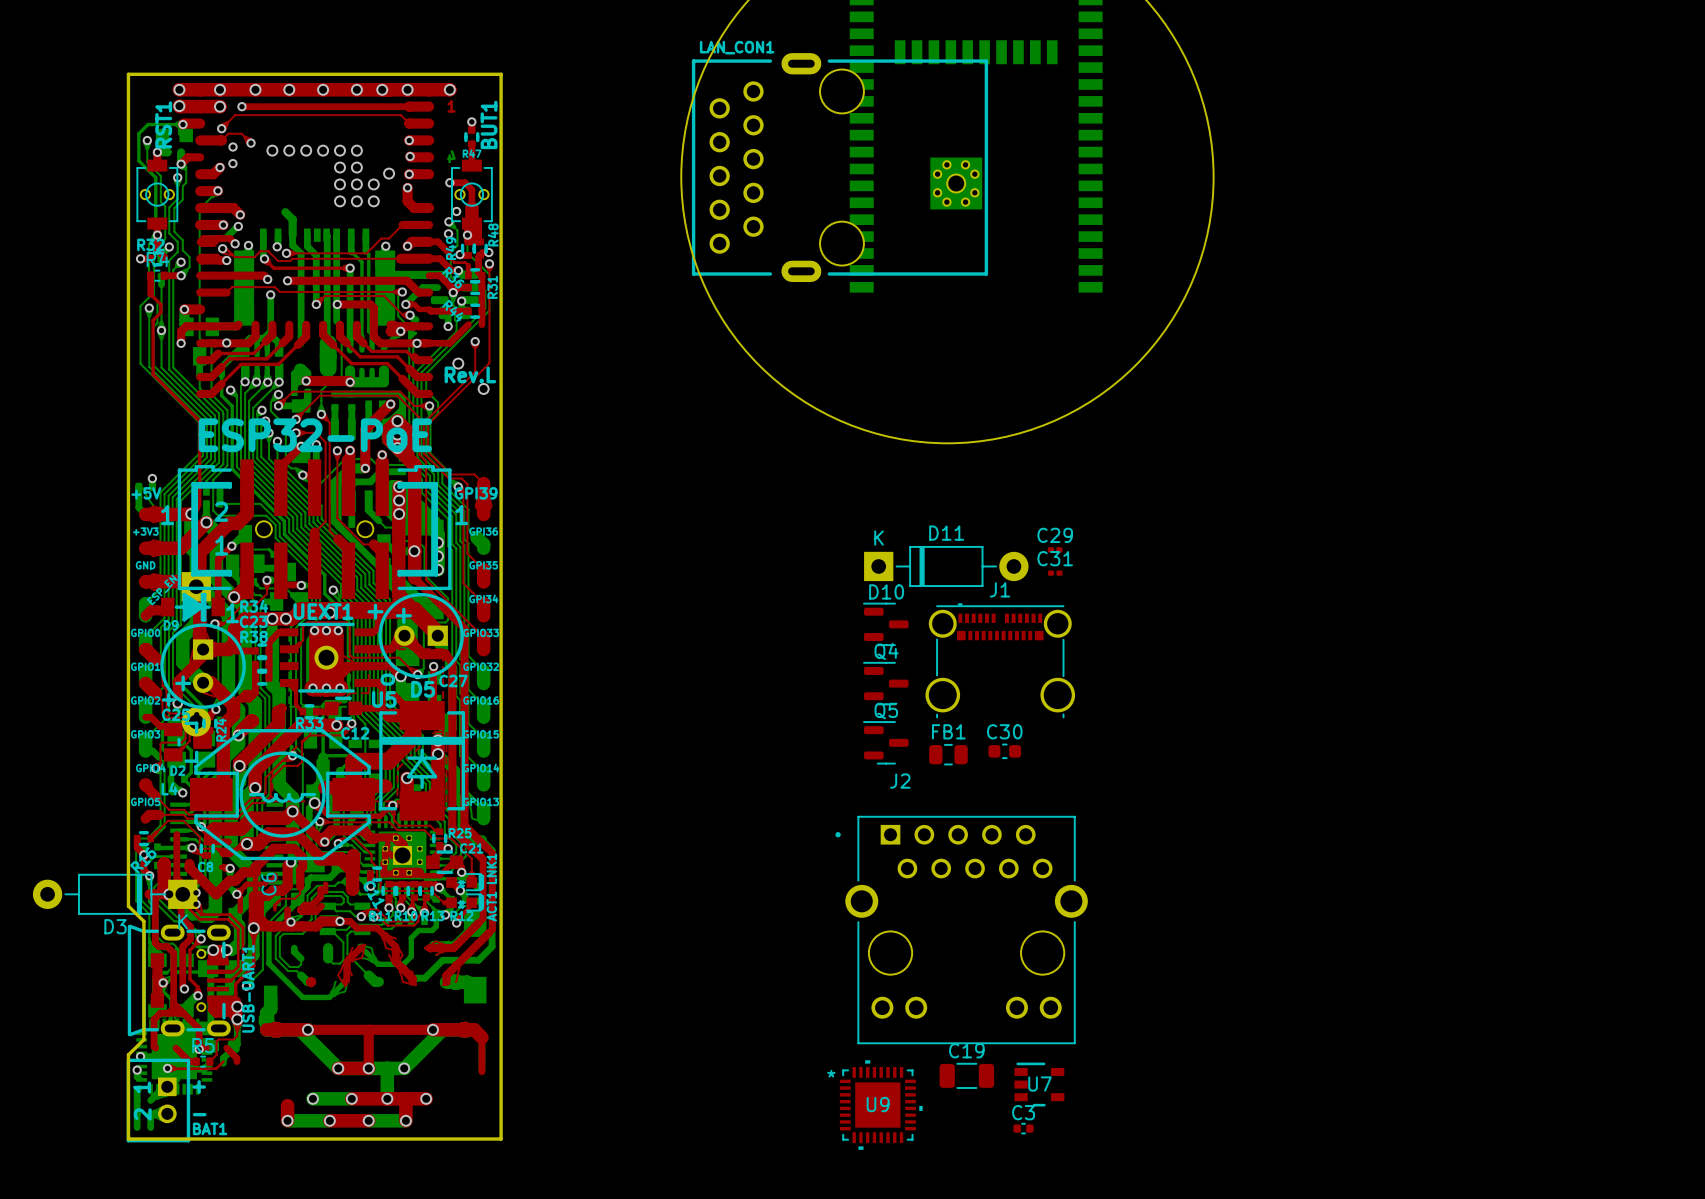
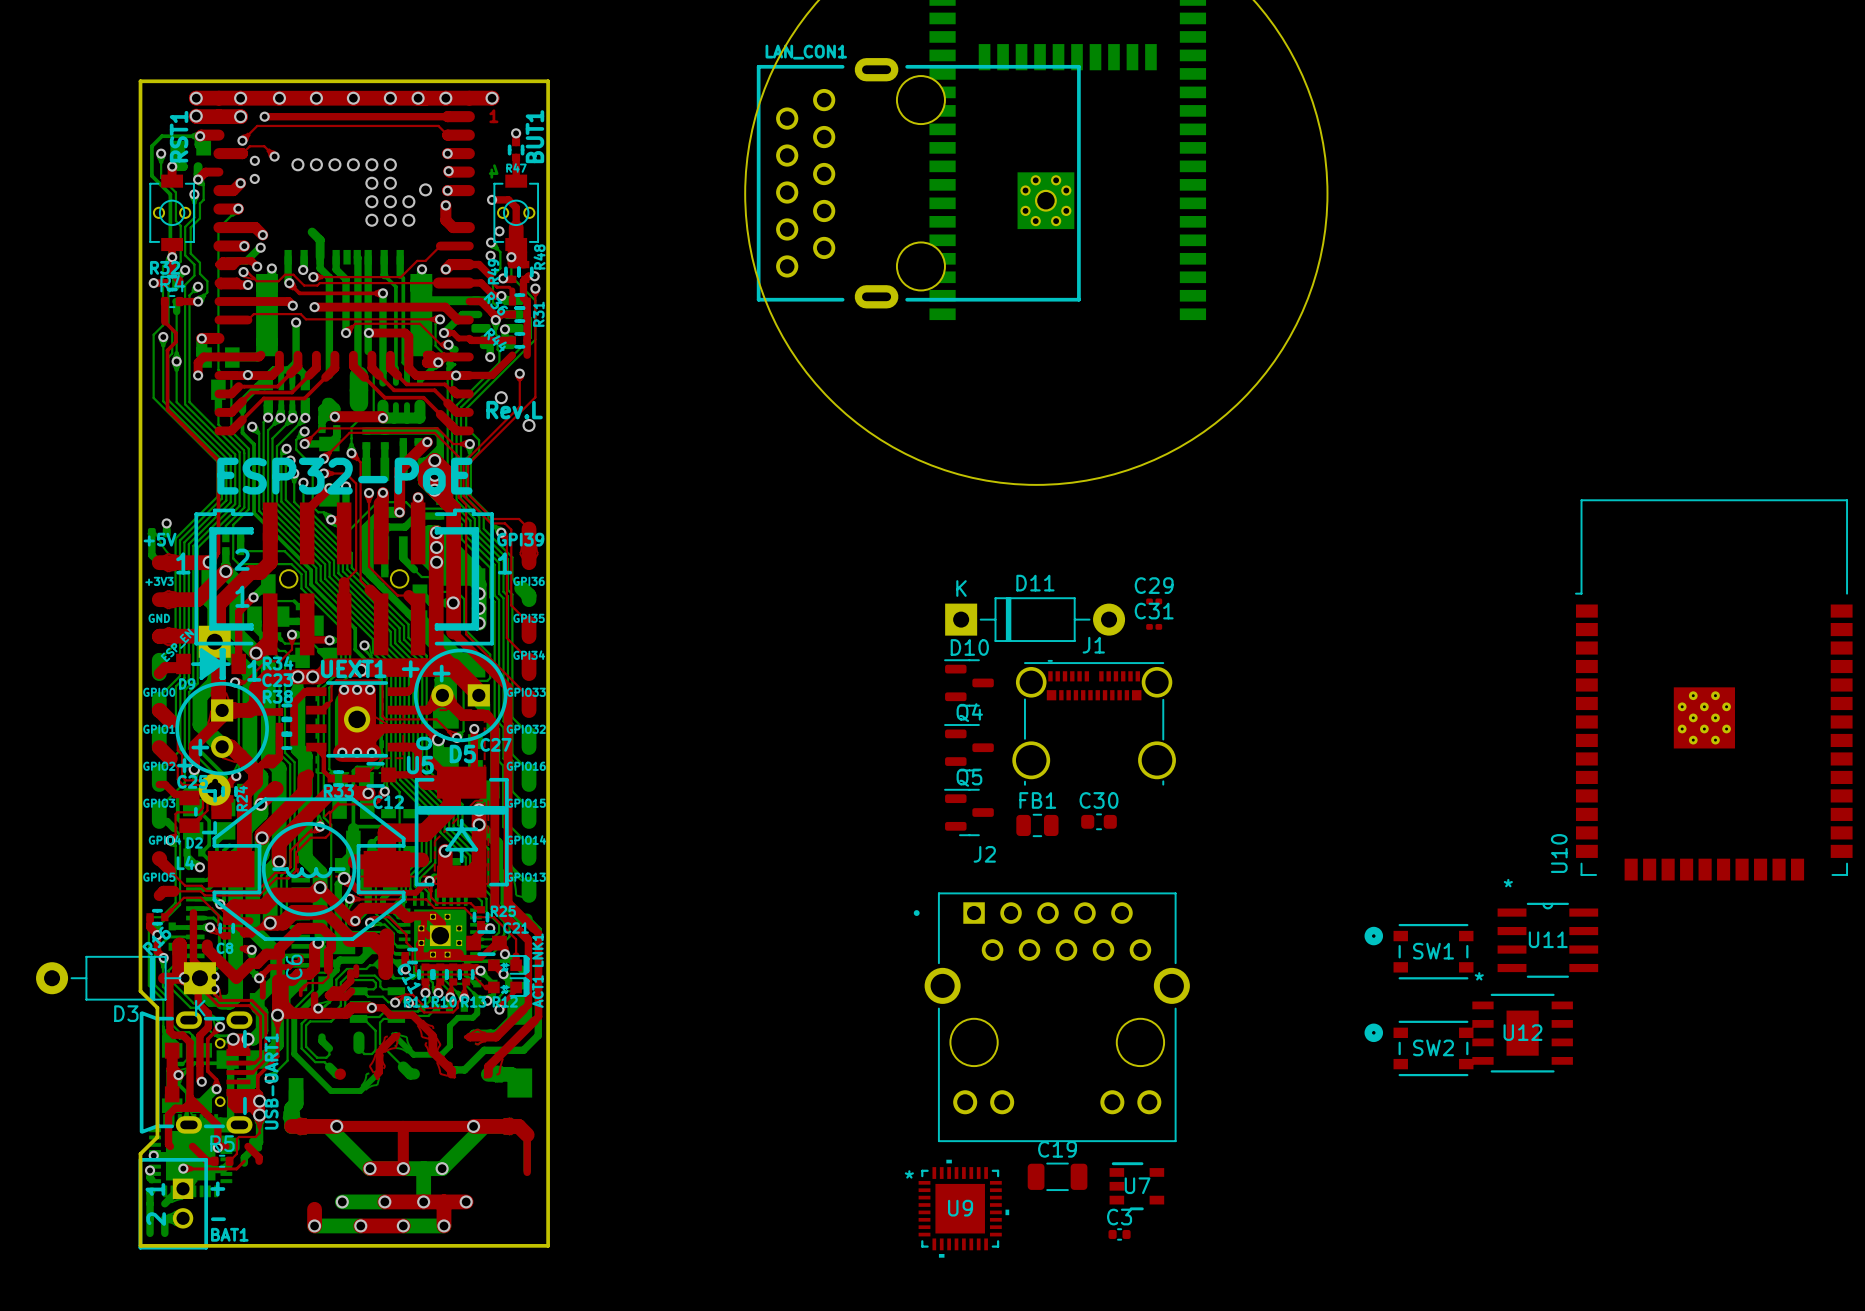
U10: none -> (1713, 689)
U11: none -> (1547, 940)
SW1: none -> (1419, 951)
U12: none -> (1522, 1033)
SW2: none -> (1419, 1048)

